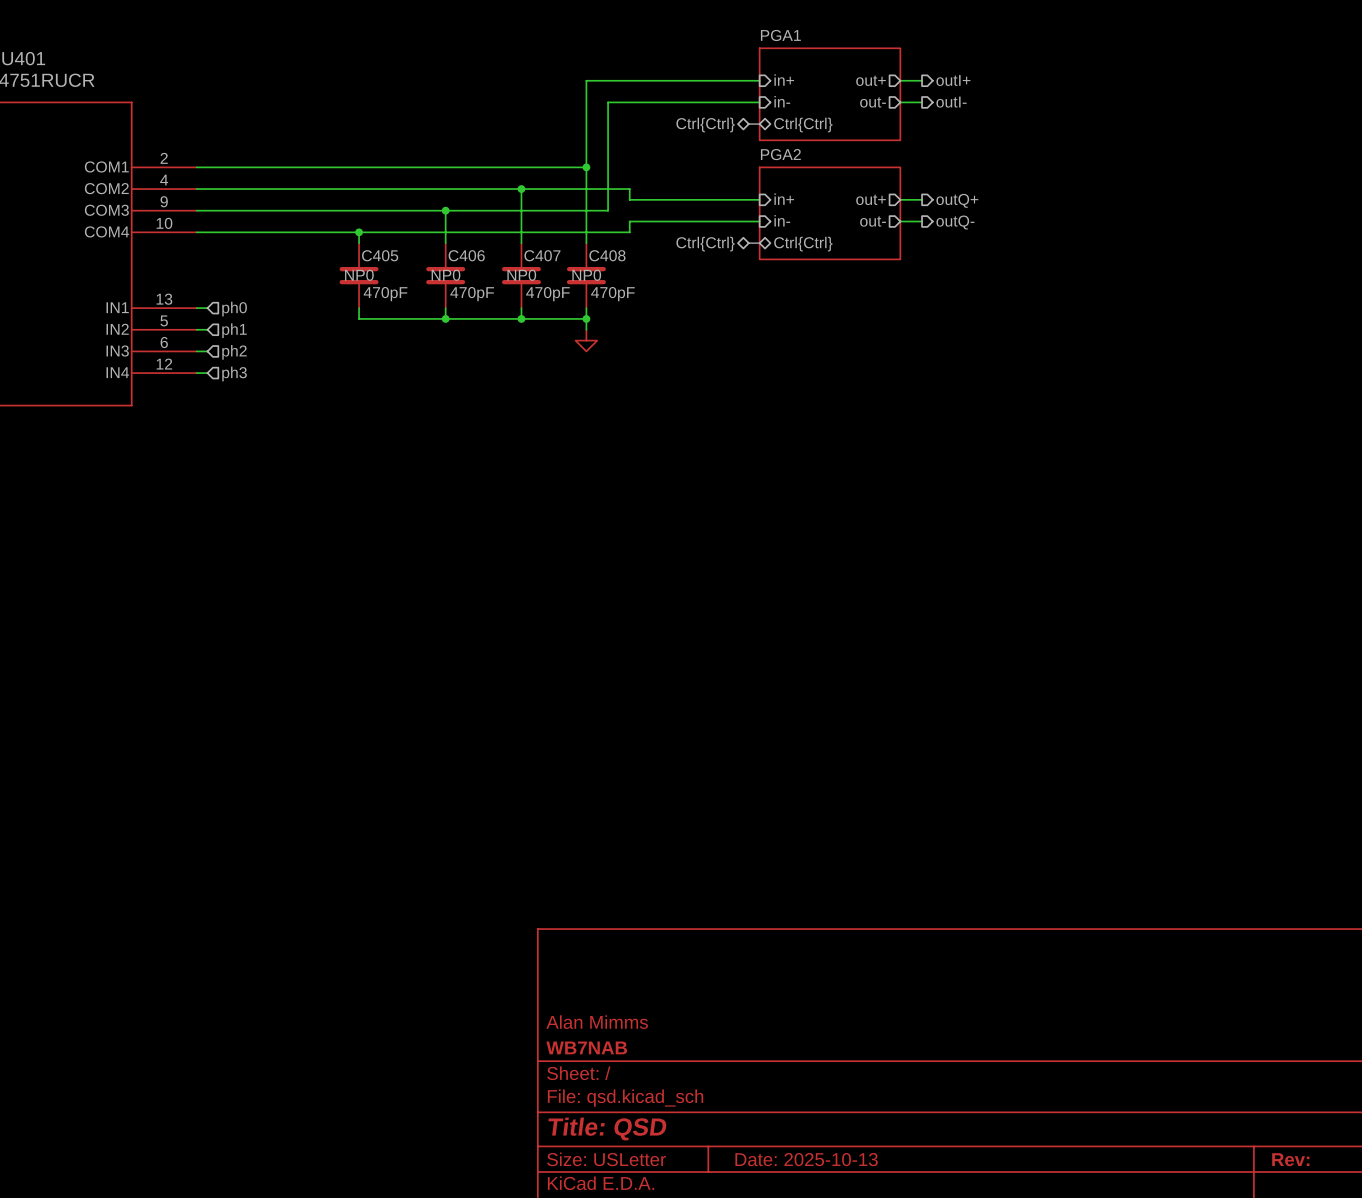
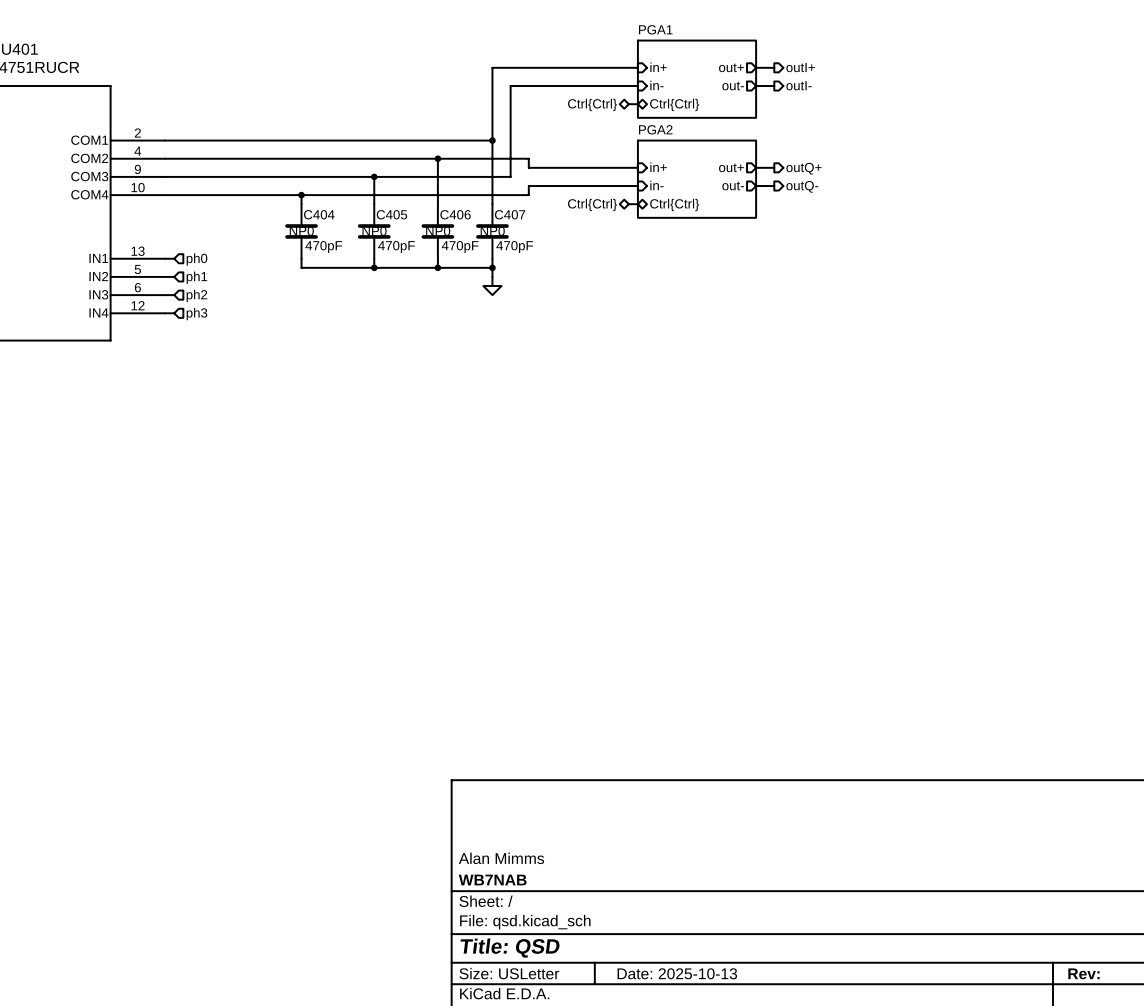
C405 name: C405 (380, 255) -> C404 (319, 214)
C406 name: C406 (466, 255) -> C405 (391, 214)
C407 name: C407 (542, 255) -> C406 (455, 214)
C408 name: C408 (607, 255) -> C407 (510, 214)

